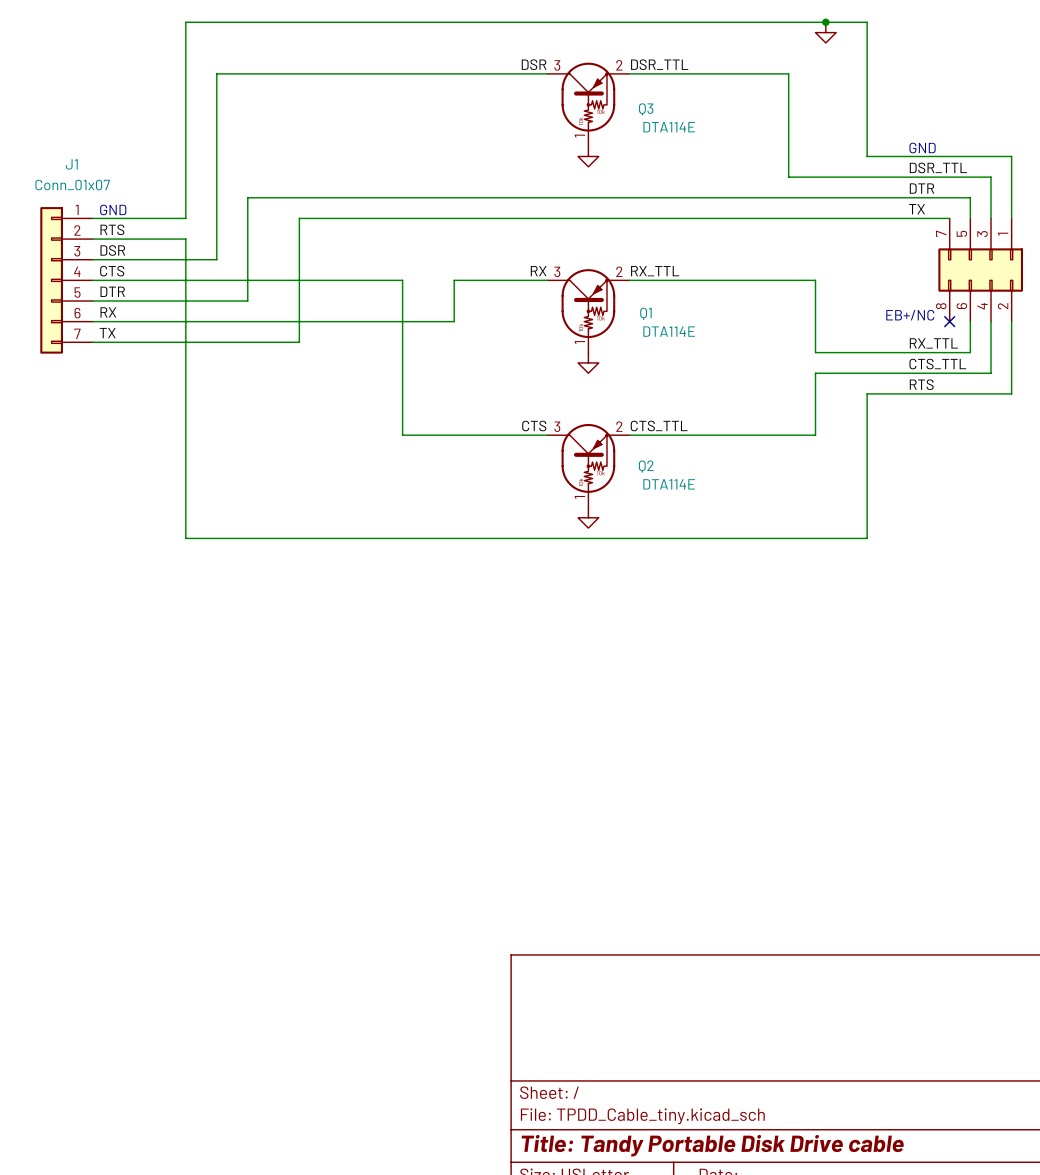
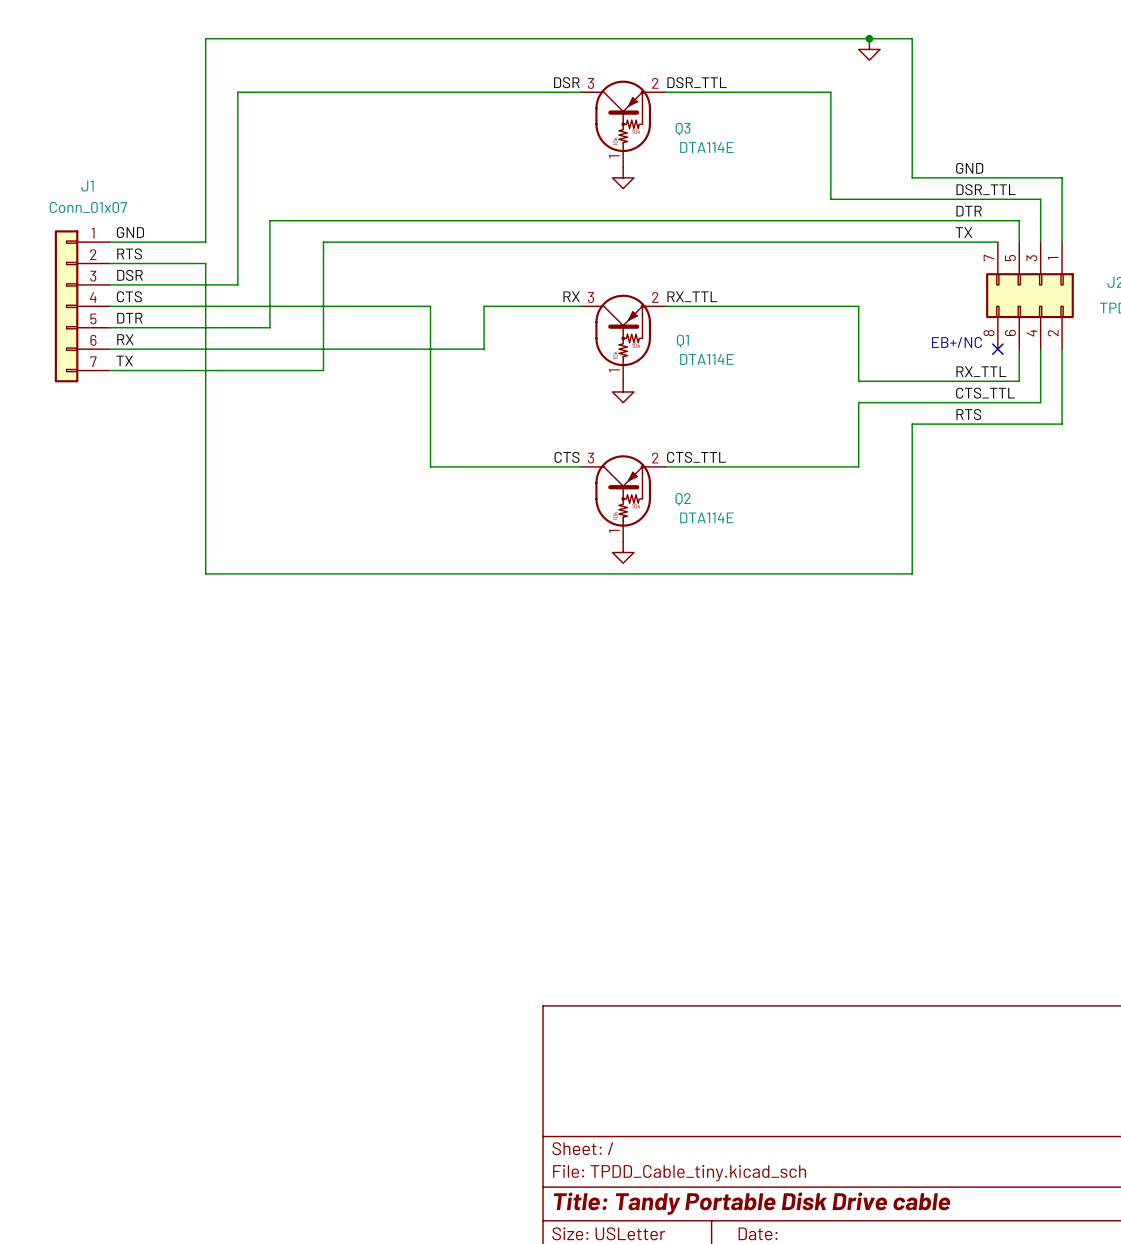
label: none -> GND (969, 168)
text: GND (922, 148) -> none
text: GND (113, 209) -> none
label: none -> GND (130, 232)

